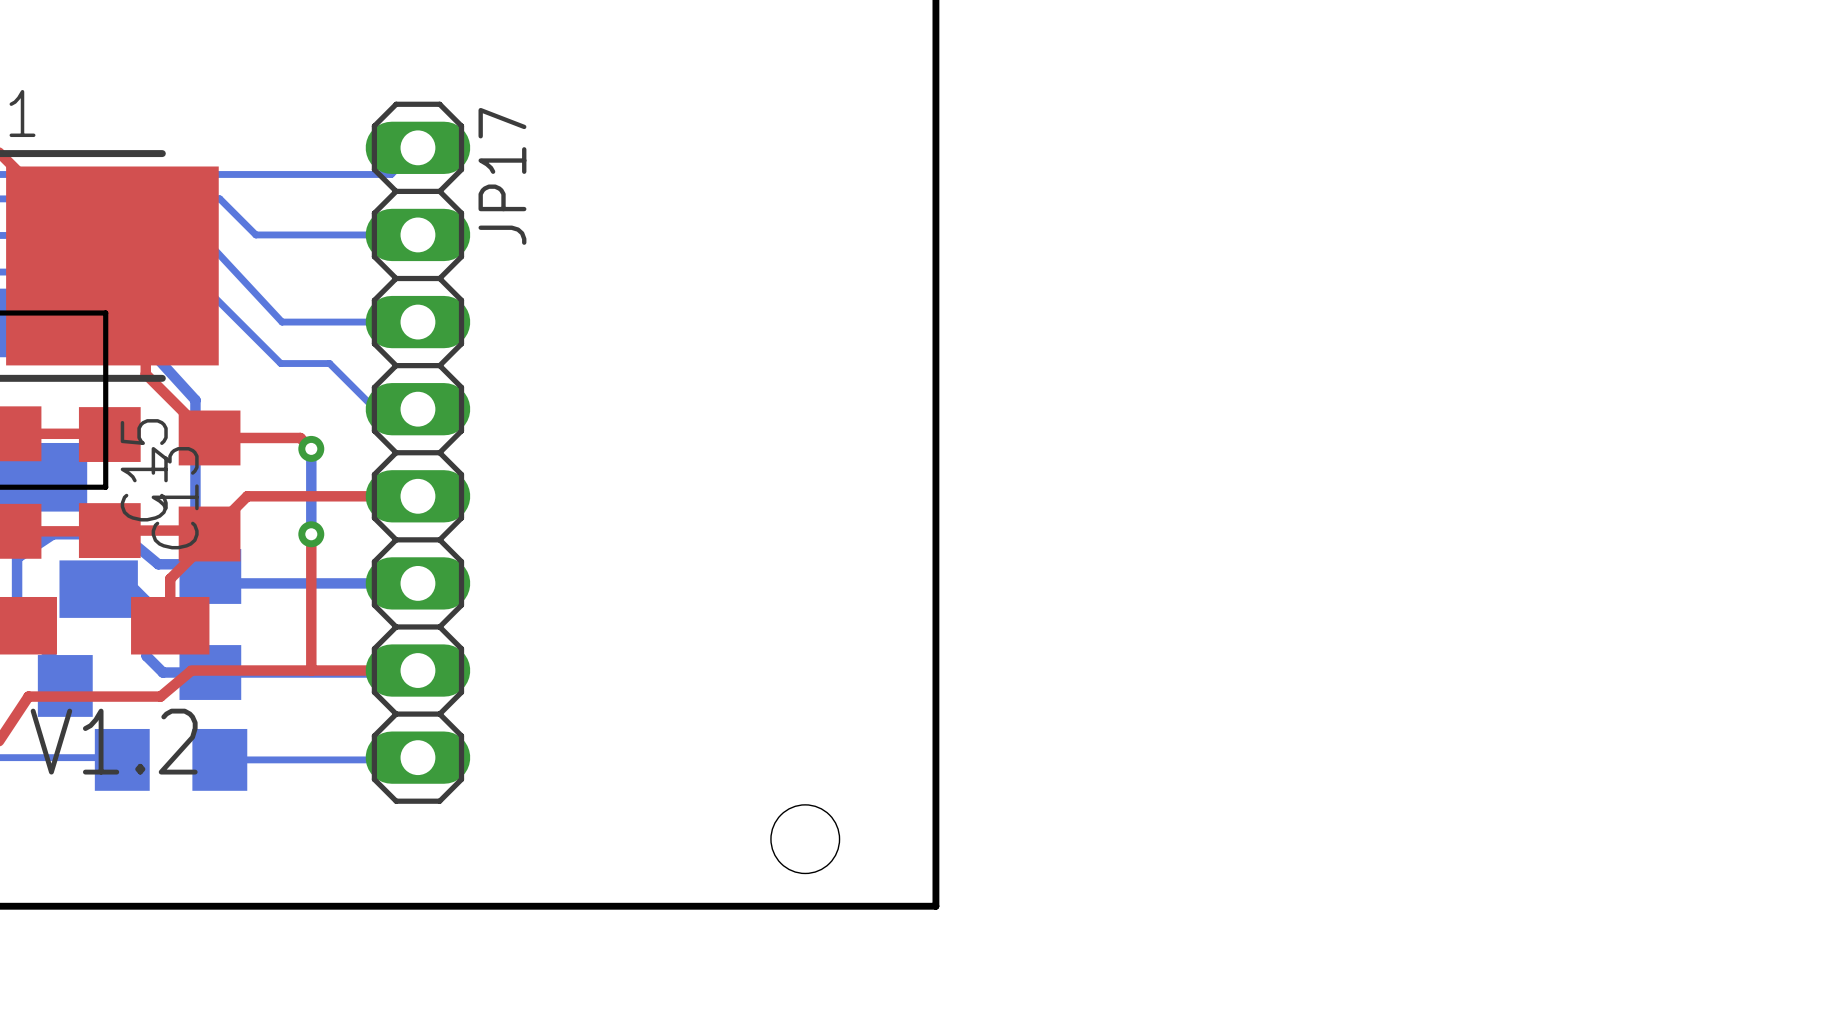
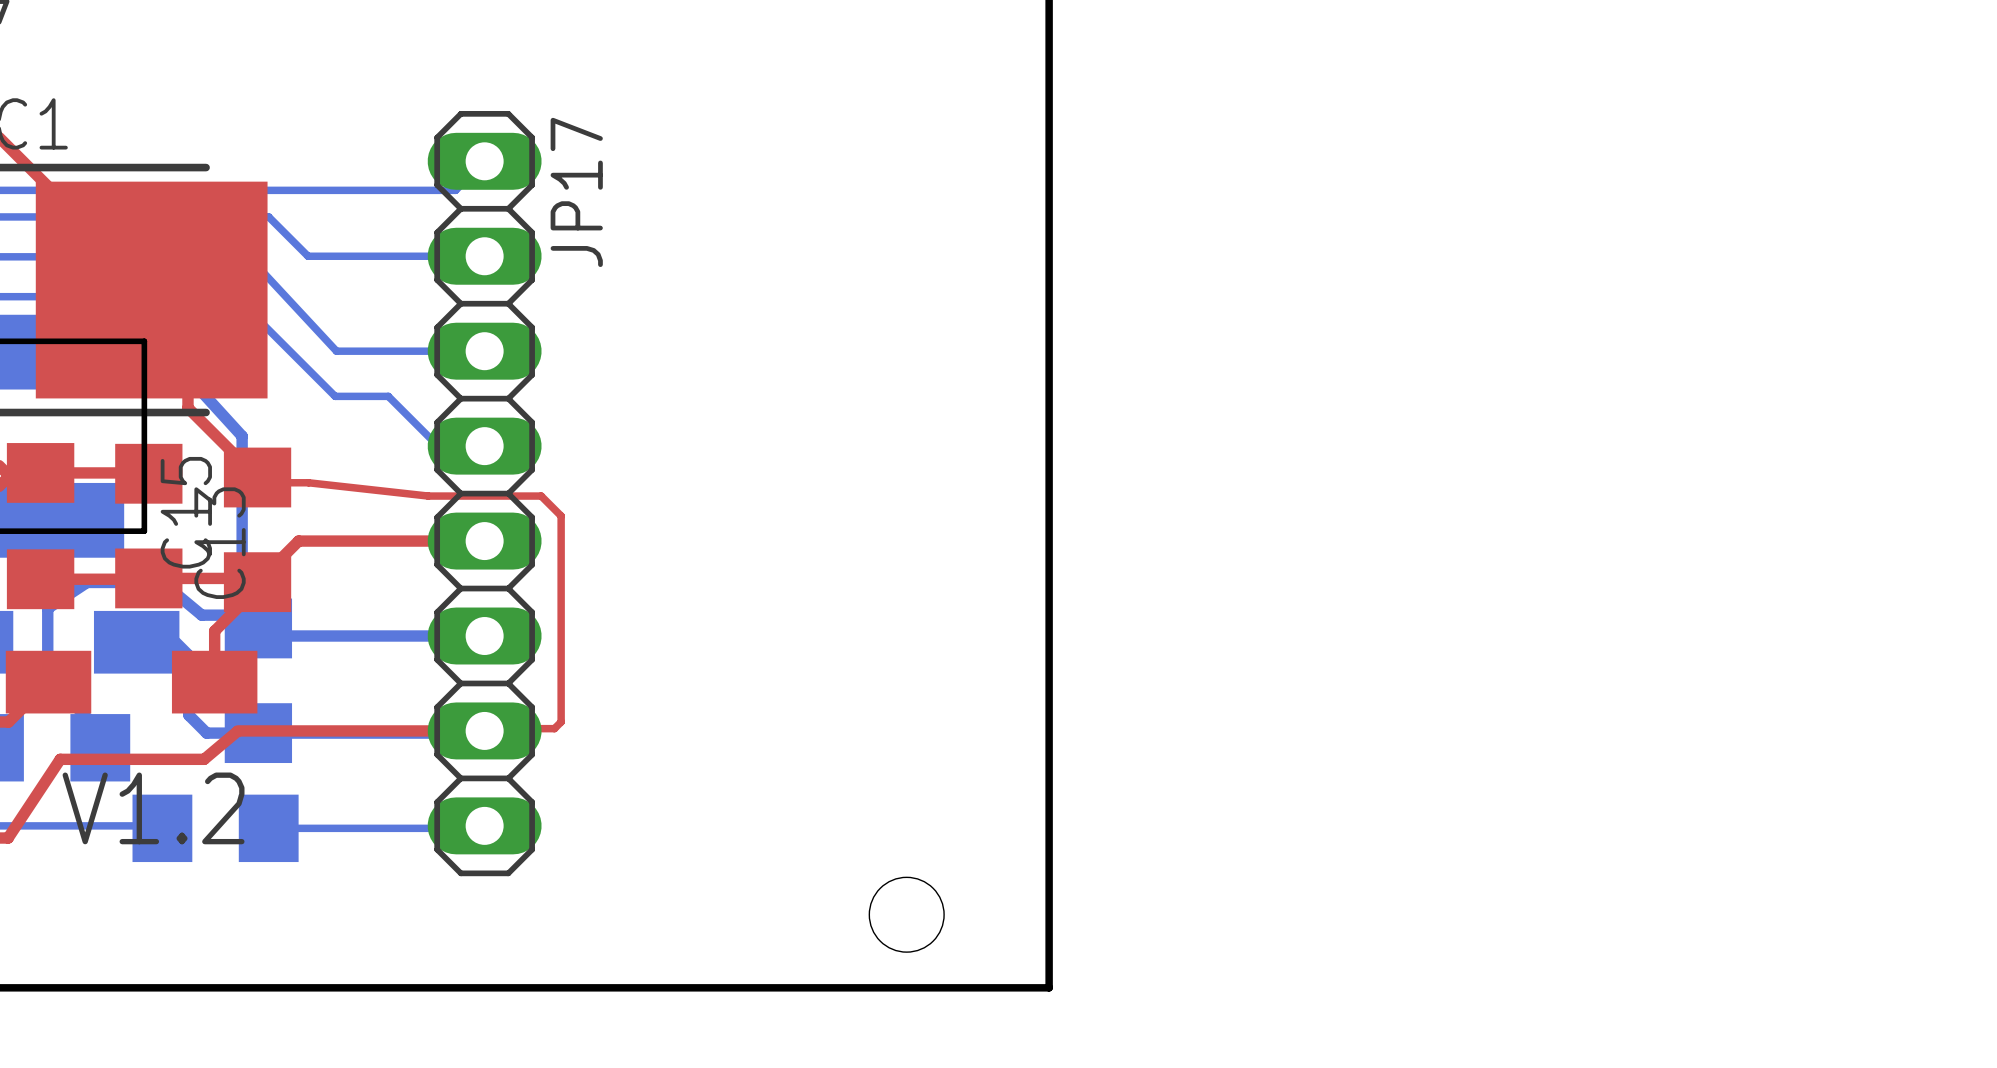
top track: (215, 437) (300, 437) (311, 448) -> (263, 477) (268, 482) (308, 482) (428, 496) (541, 496) (561, 515) (561, 722) (554, 728) (486, 728) (484, 730)
bottom track: (311, 448) (311, 534) -> none
via: (311, 448) -> none
top track: (311, 534) (311, 670) -> none
via: (311, 534) -> none

